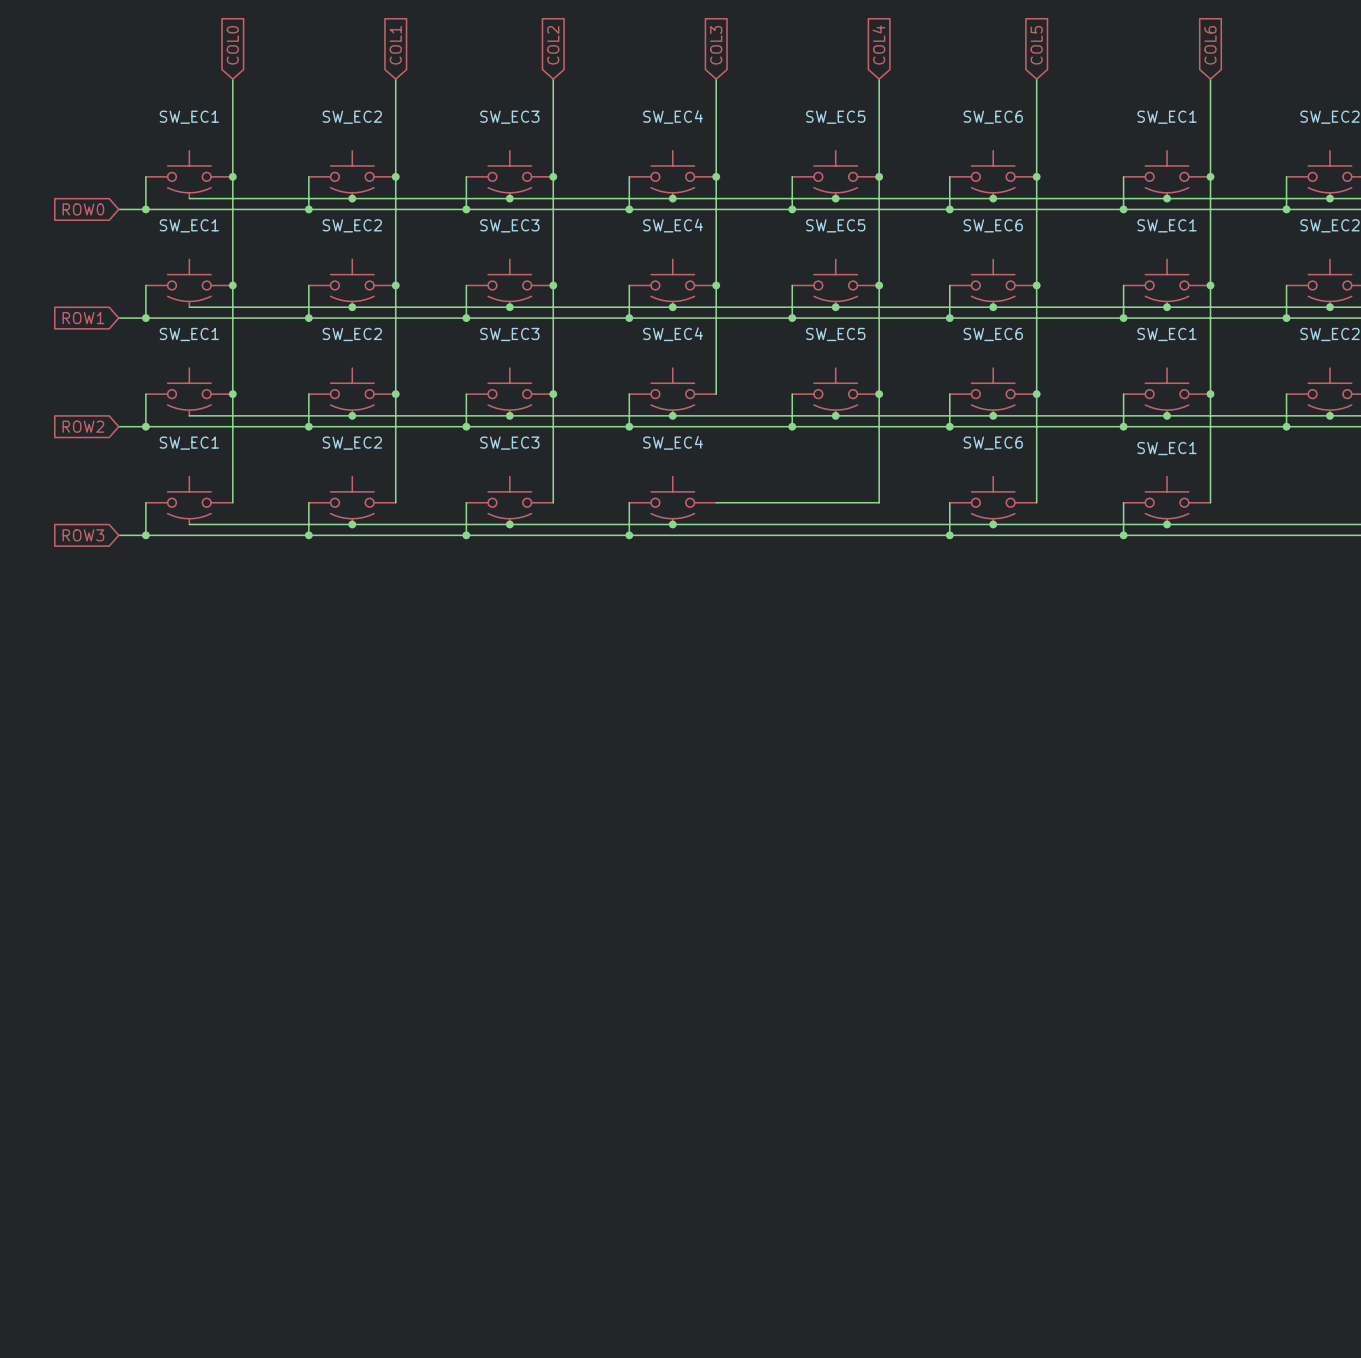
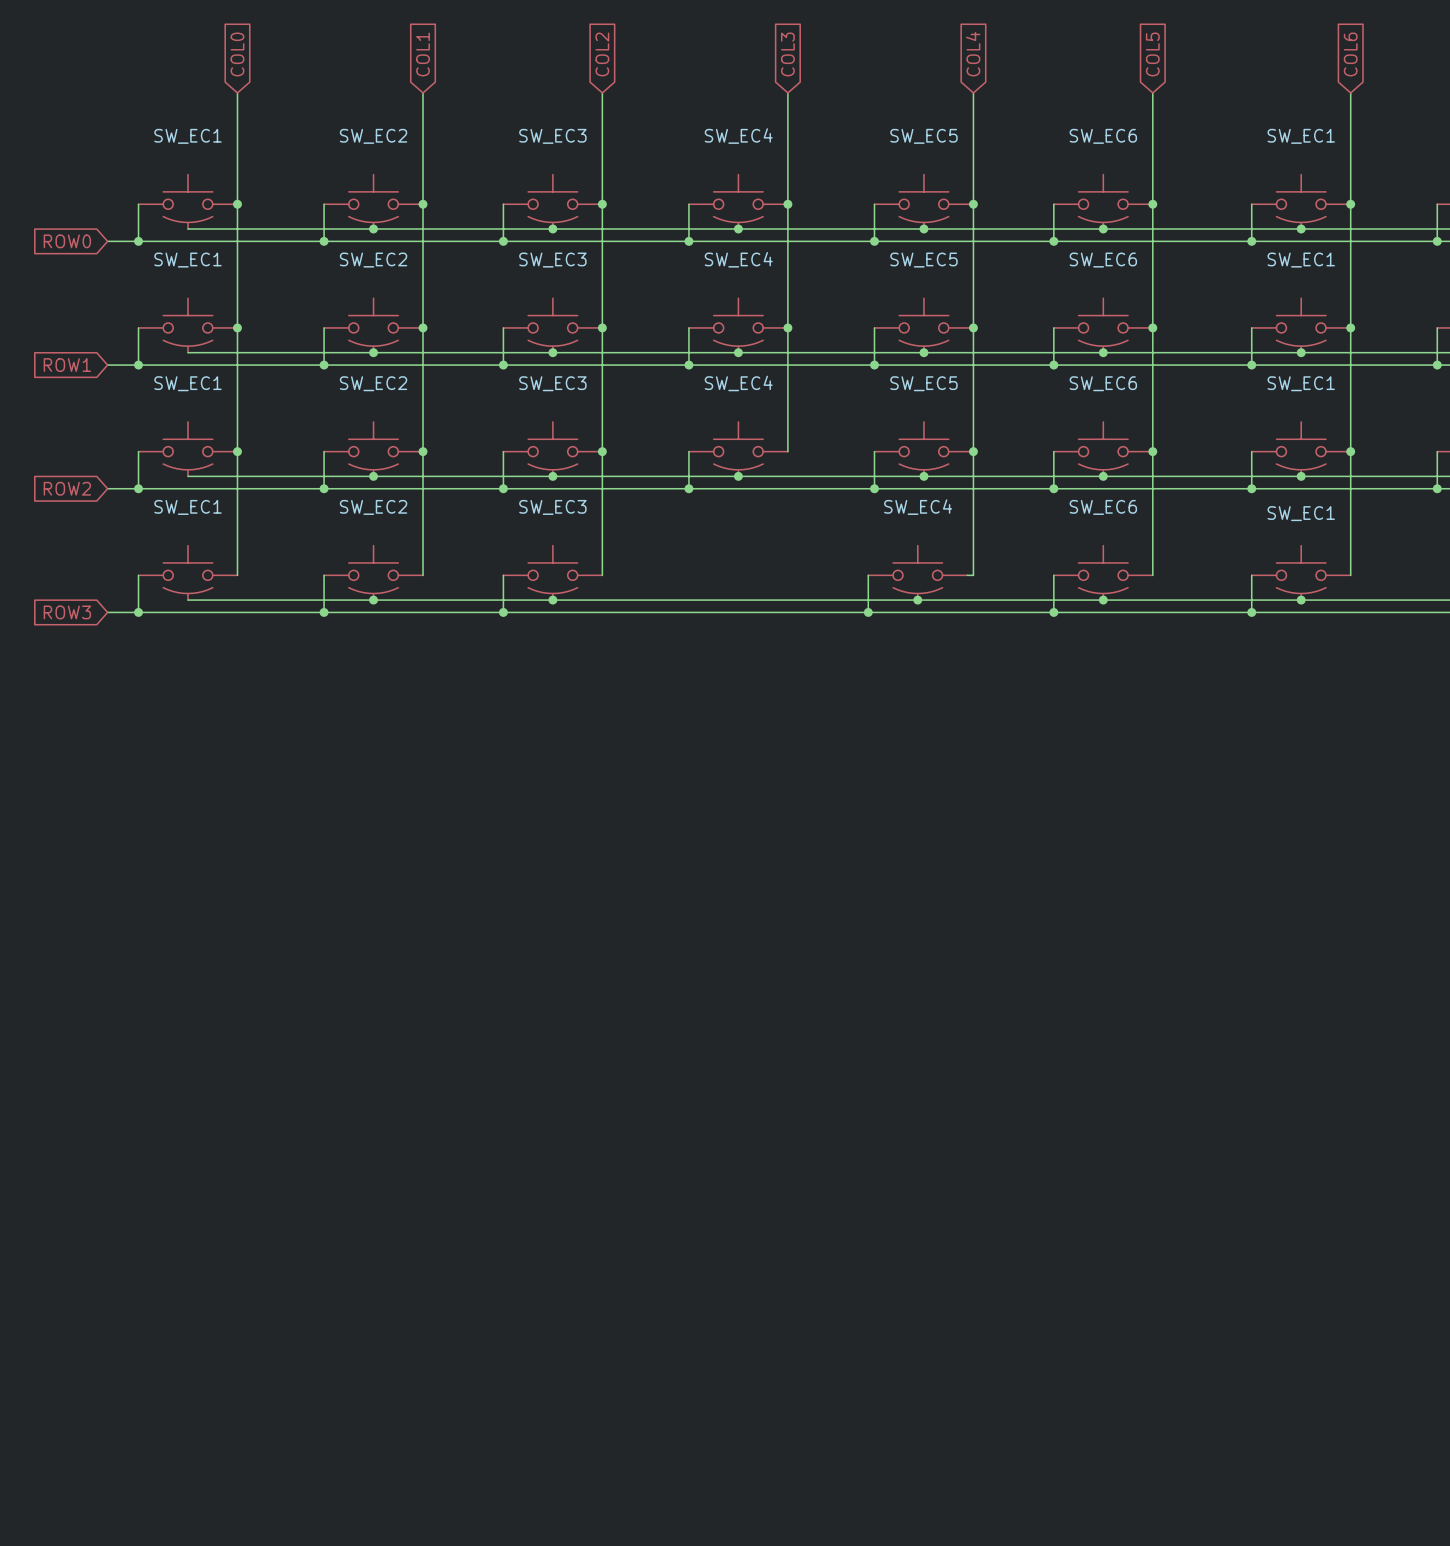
SW_EC4 position: (672, 500) -> (917, 572)
wire: (629, 502) (629, 535) -> (868, 575) (868, 612)
wire: (716, 502) (873, 502) -> none
junction: (672, 524) -> none
junction: none -> (917, 600)
junction: (629, 535) -> none
junction: none -> (868, 612)

